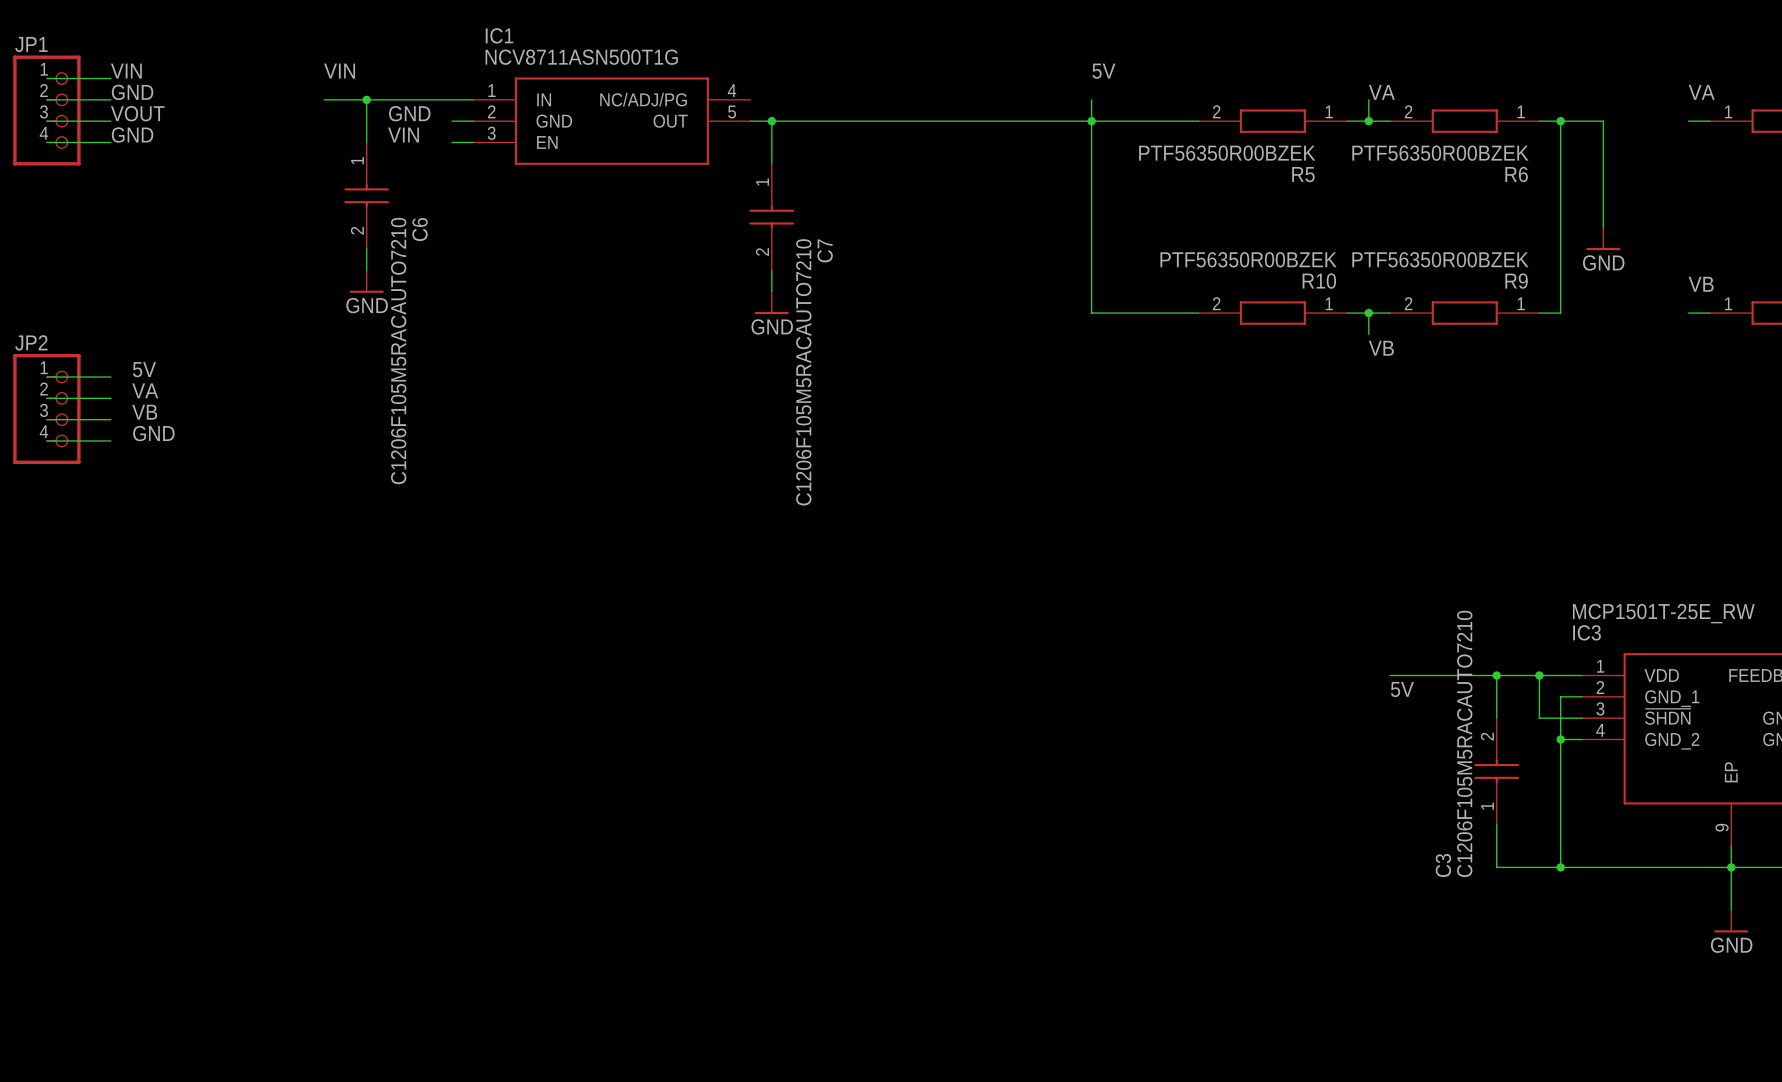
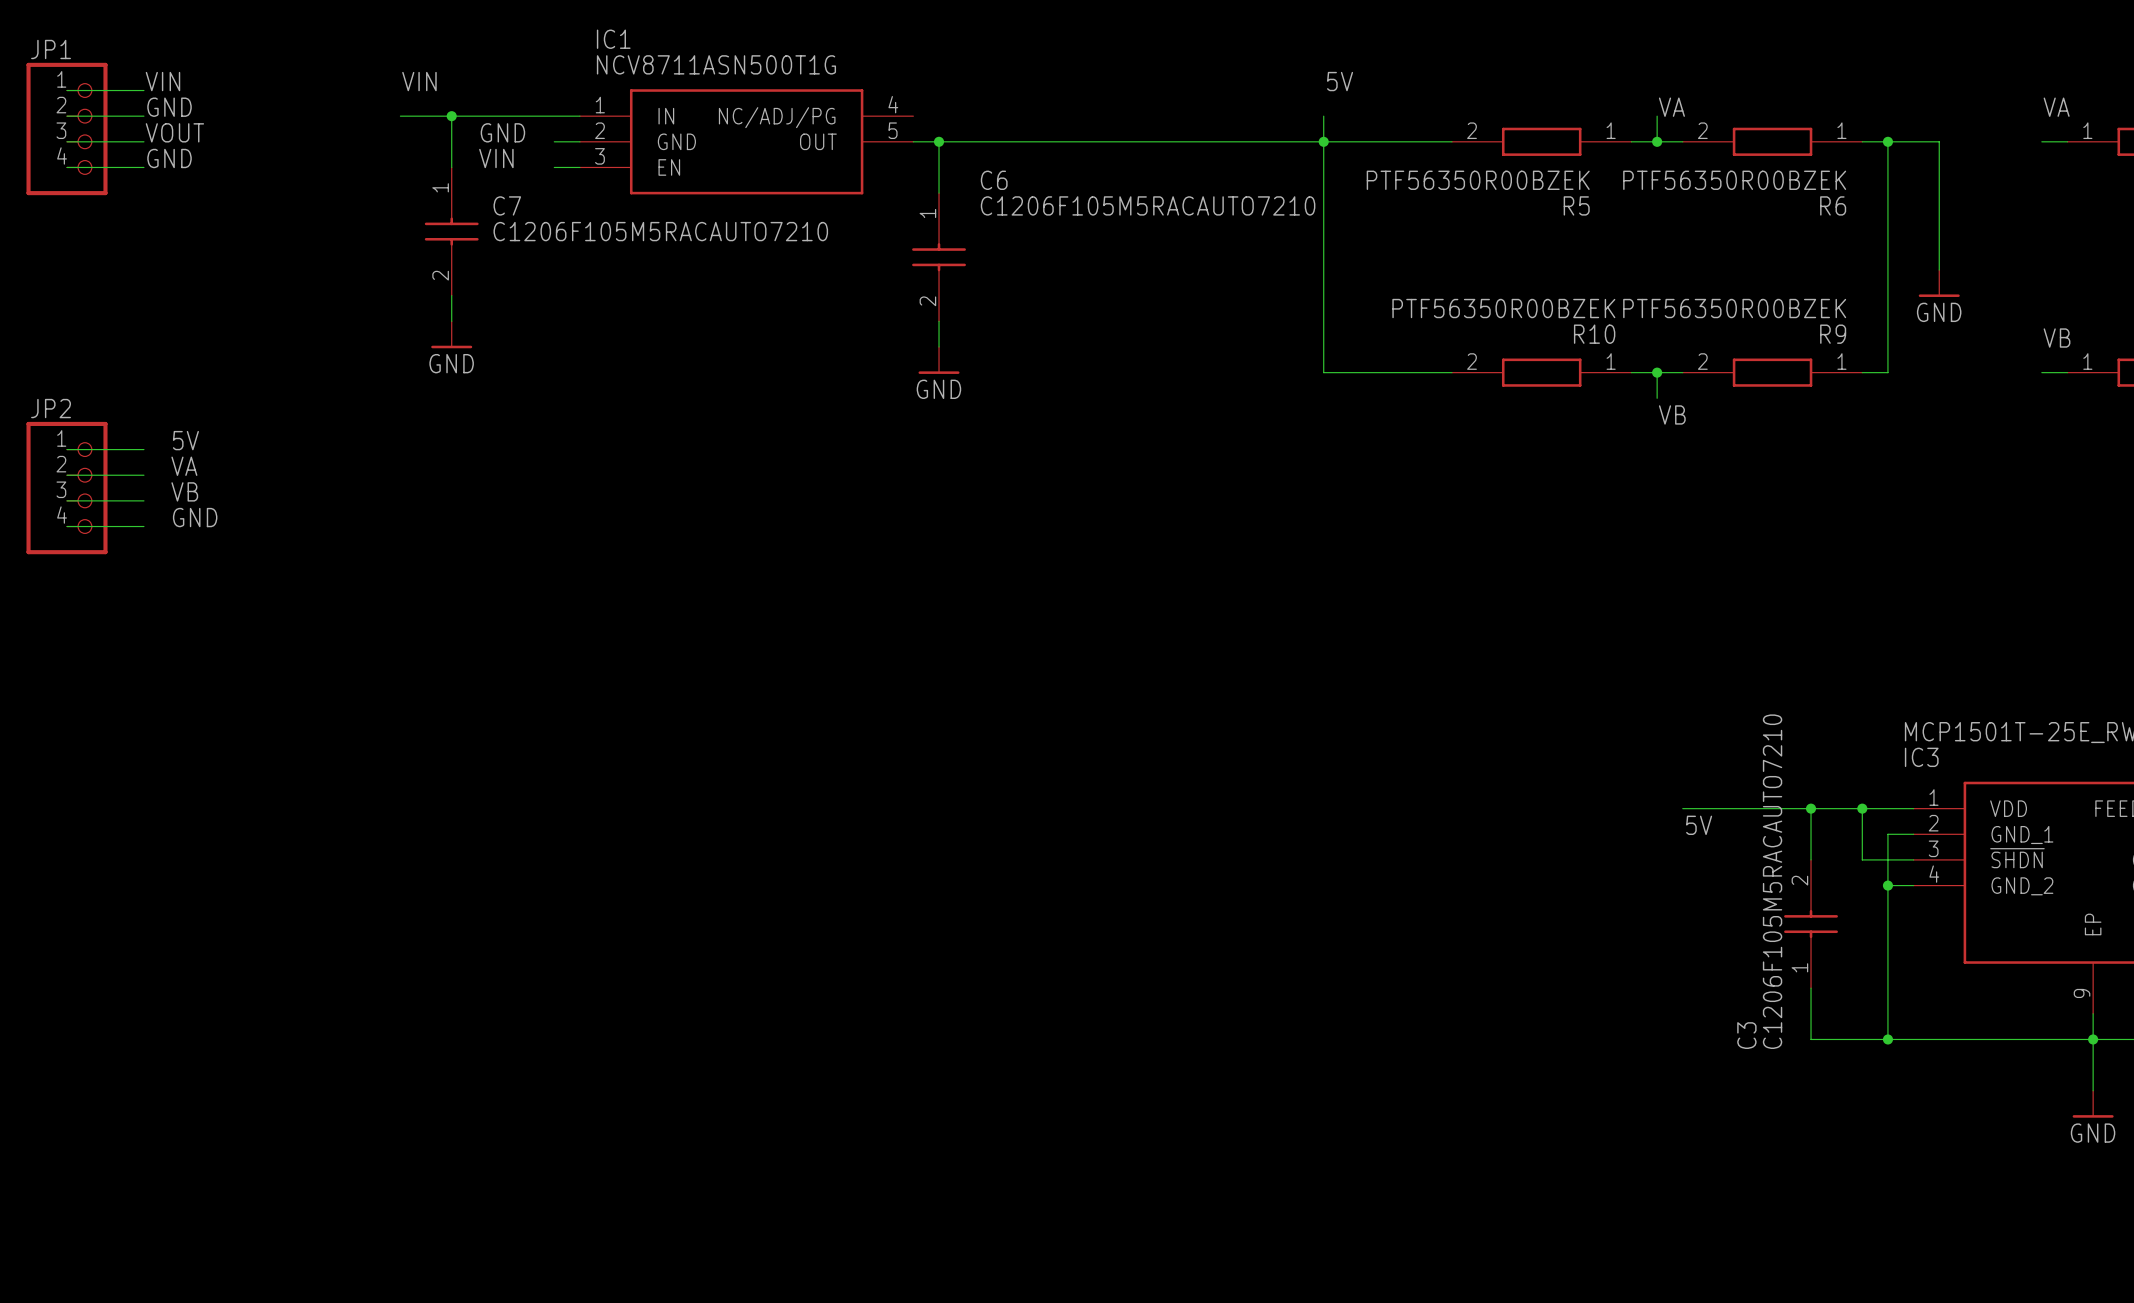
C6 name: C6 (420, 229) -> C7 (507, 205)
C7 name: C7 (825, 250) -> C6 (994, 180)
C6 value rotation: 0° (398, 351) -> 90° clockwise (660, 231)
C7 value rotation: 0° (803, 372) -> 90° clockwise (1148, 205)

